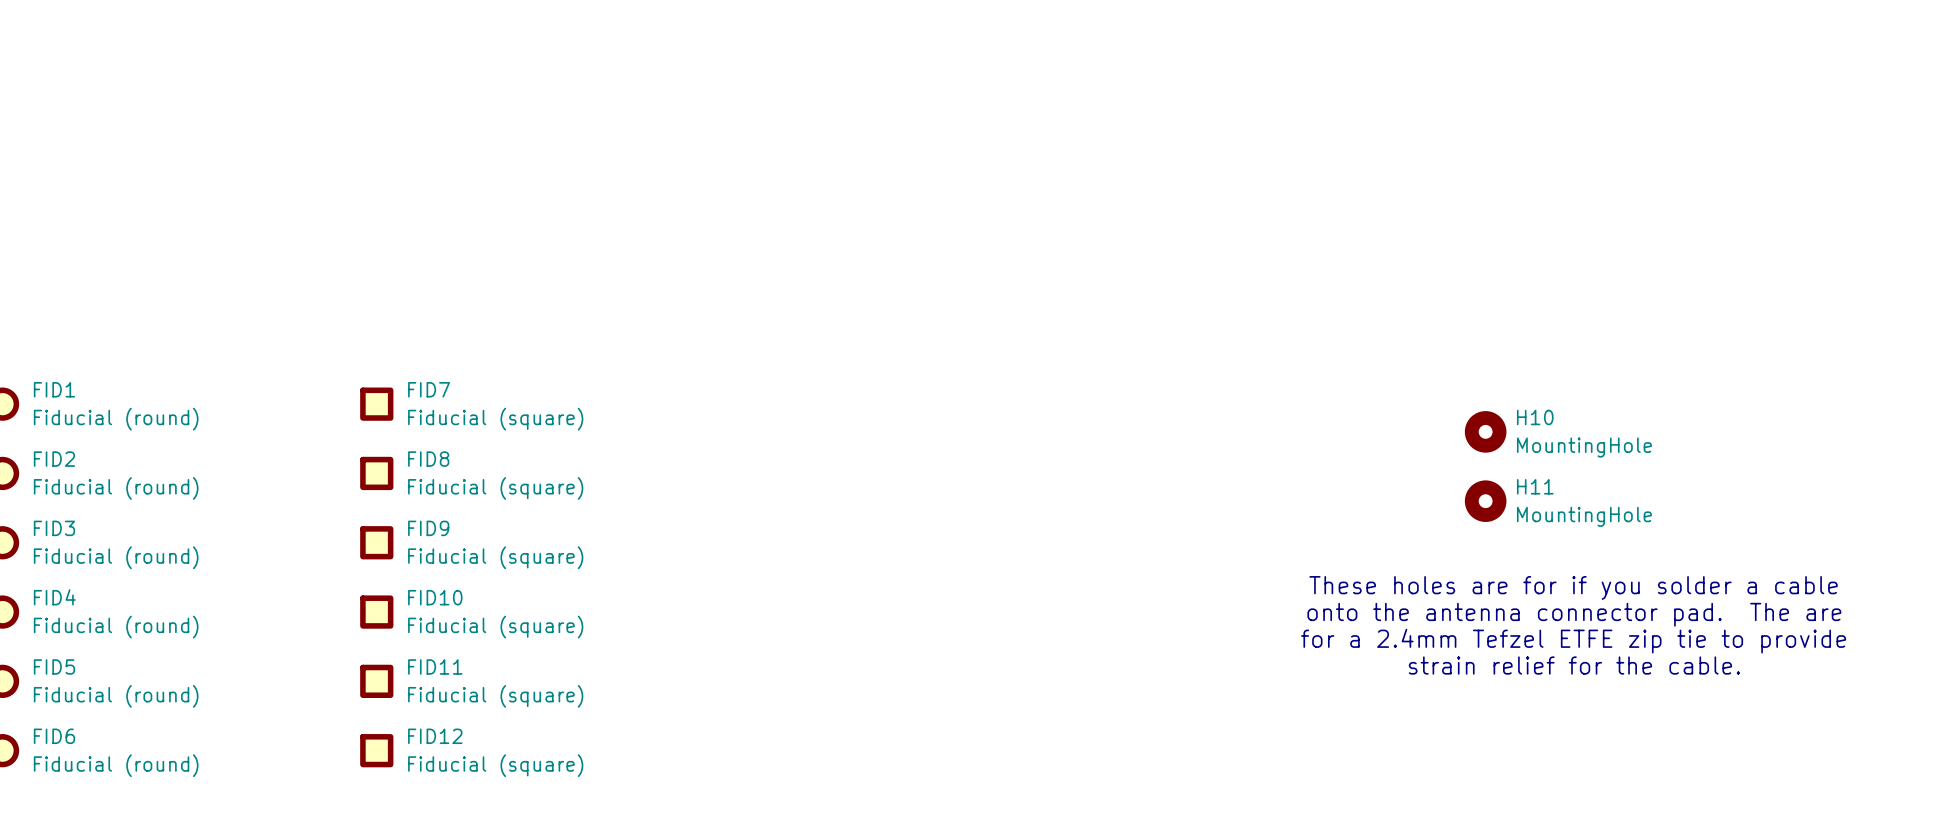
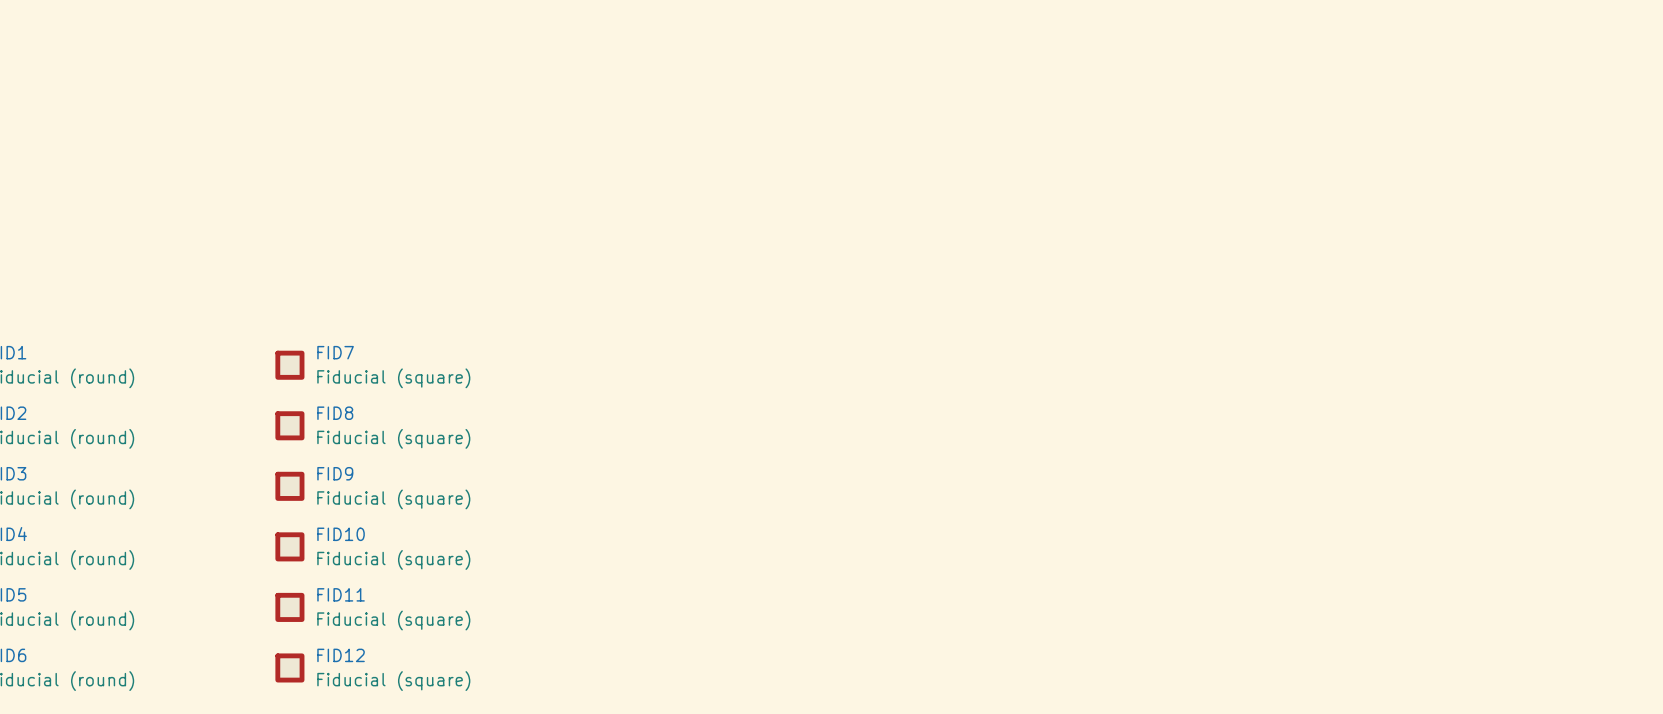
H10: MountingHole (1485, 431) -> none
H11: MountingHole (1485, 501) -> none
text: These holes are for if you solder a cable (1573, 587) -> none
text: onto the antenna connector pad. The are (1574, 614) -> none
text: for a 2.4mm Tefzel ETFE zip tie to provide (1573, 641) -> none
text: strain relief for the cable. (1574, 665) -> none

